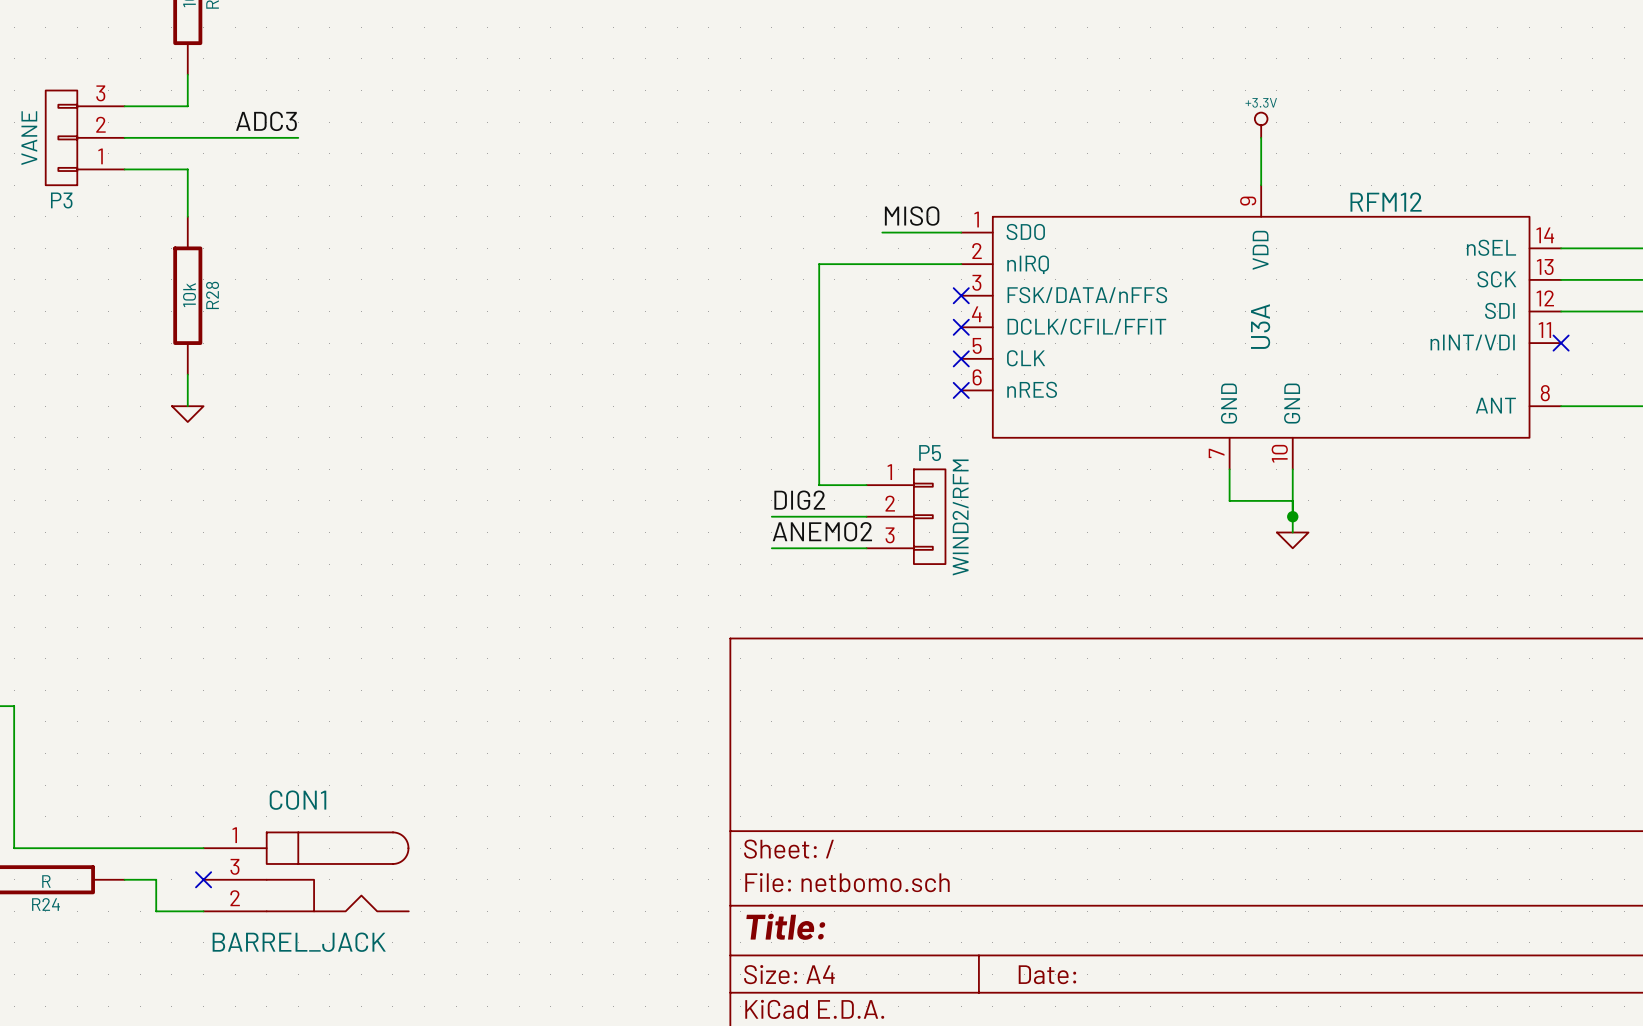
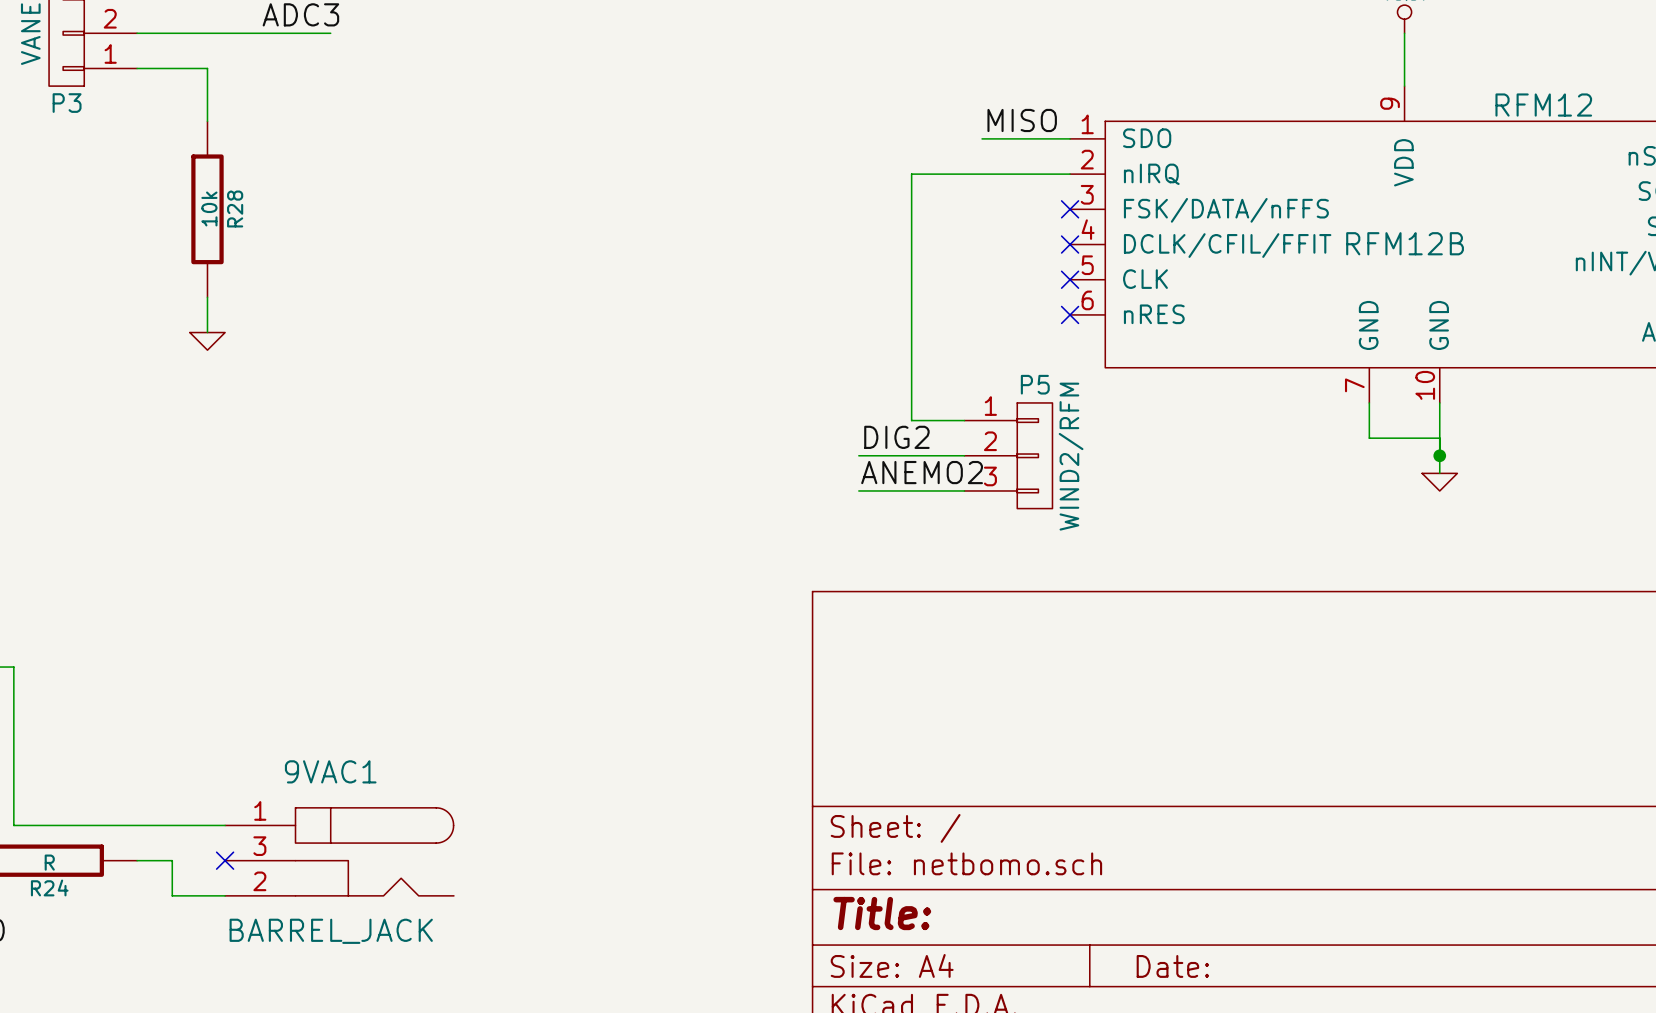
U3A name: U3A (1260, 326) -> RFM12B (1405, 243)
CON1 name: CON1 (297, 800) -> 9VAC1 (330, 771)

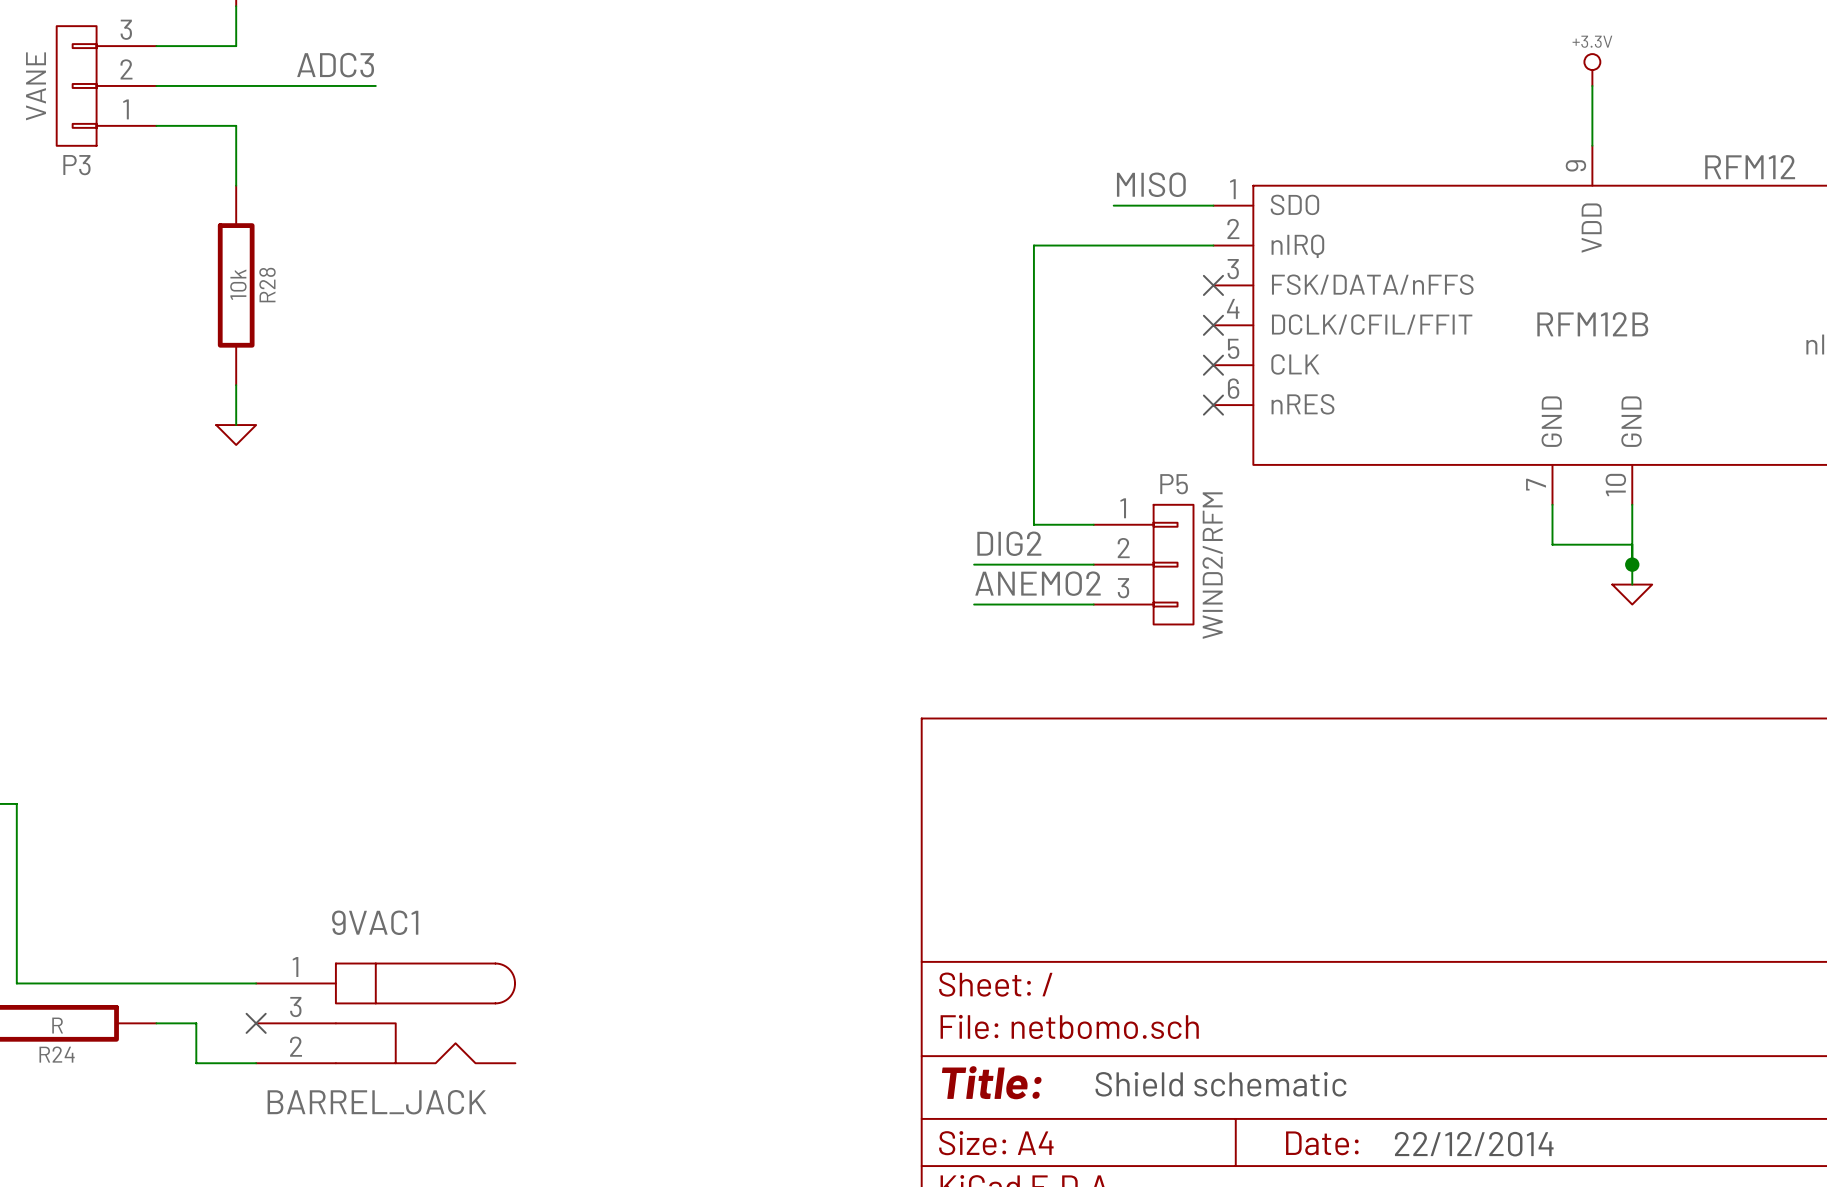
text: none -> Shield schematic (1221, 1084)
text: none -> 22/12/2014 (1474, 1144)

